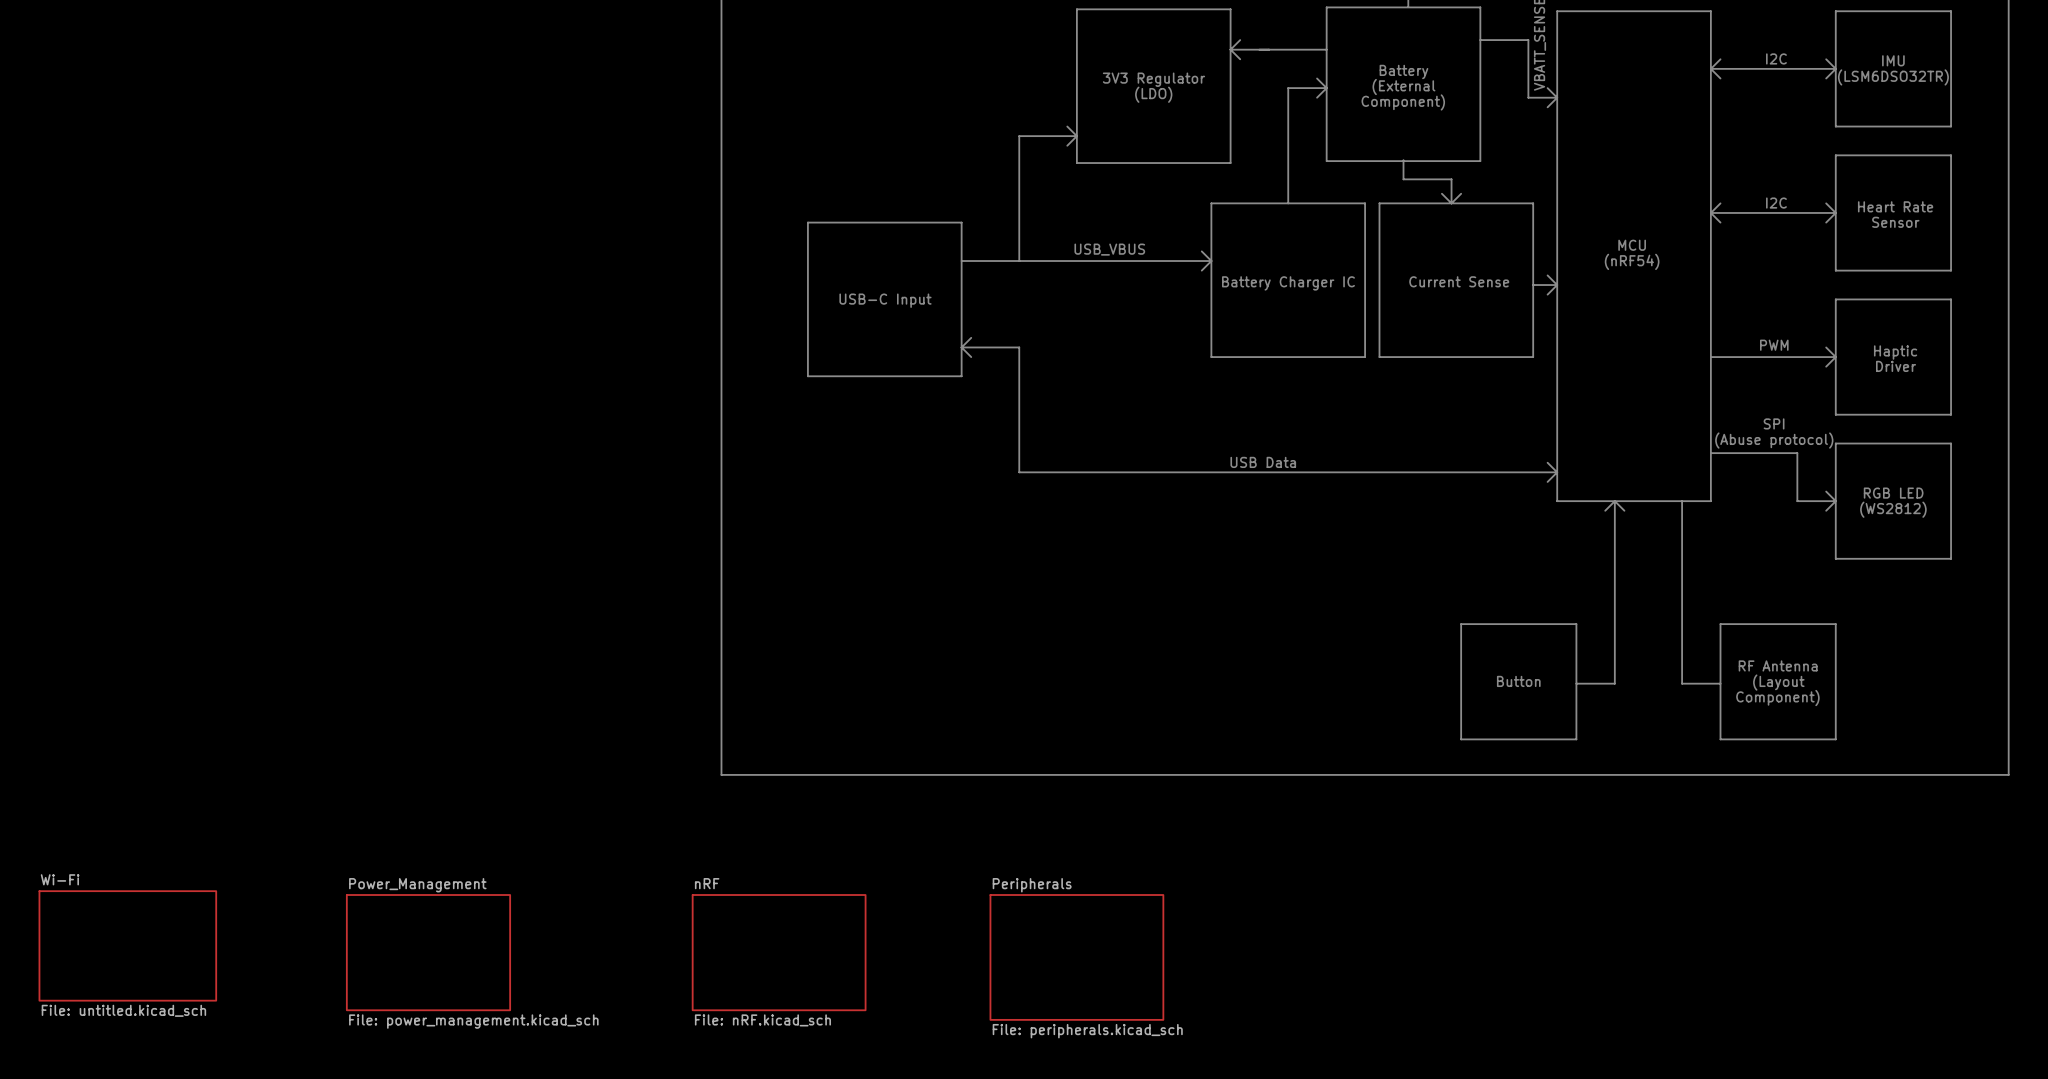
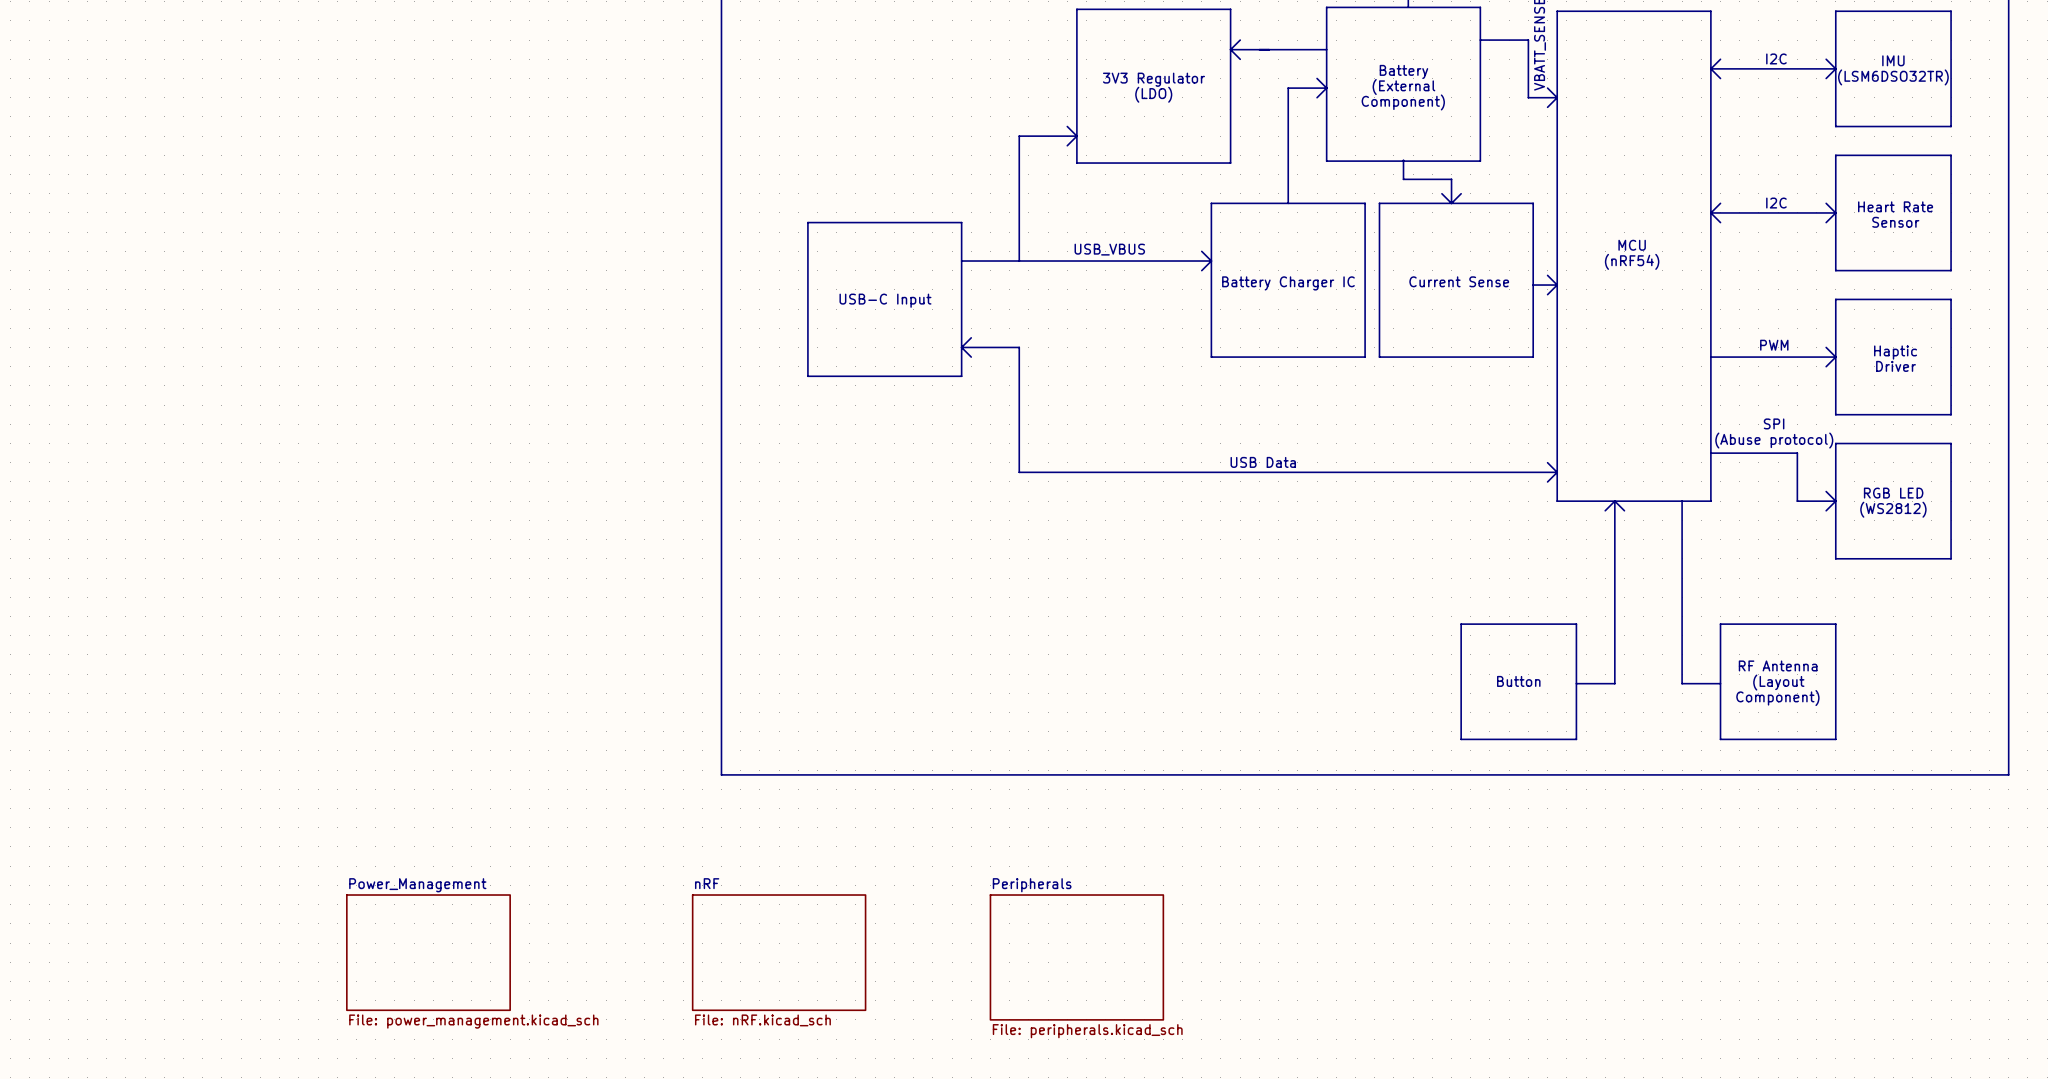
sheet Wi-Fi: File: untitled.kicad_sch (127, 945) -> none

